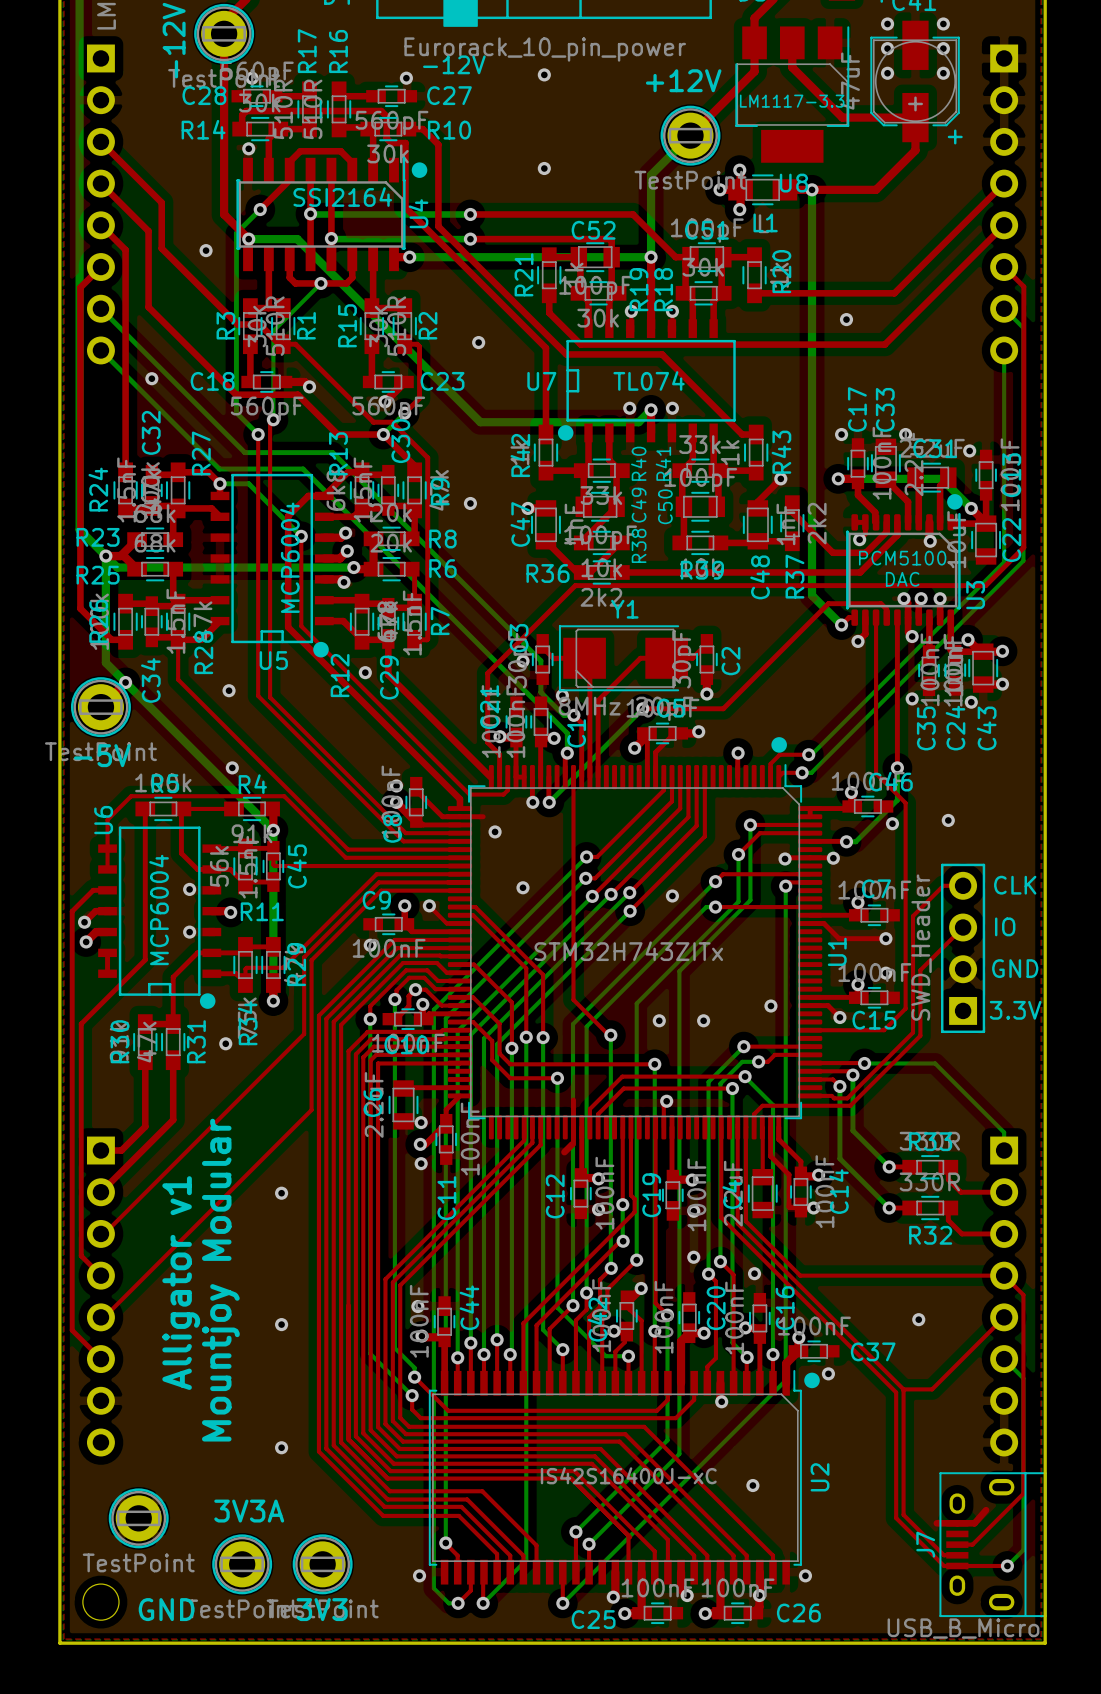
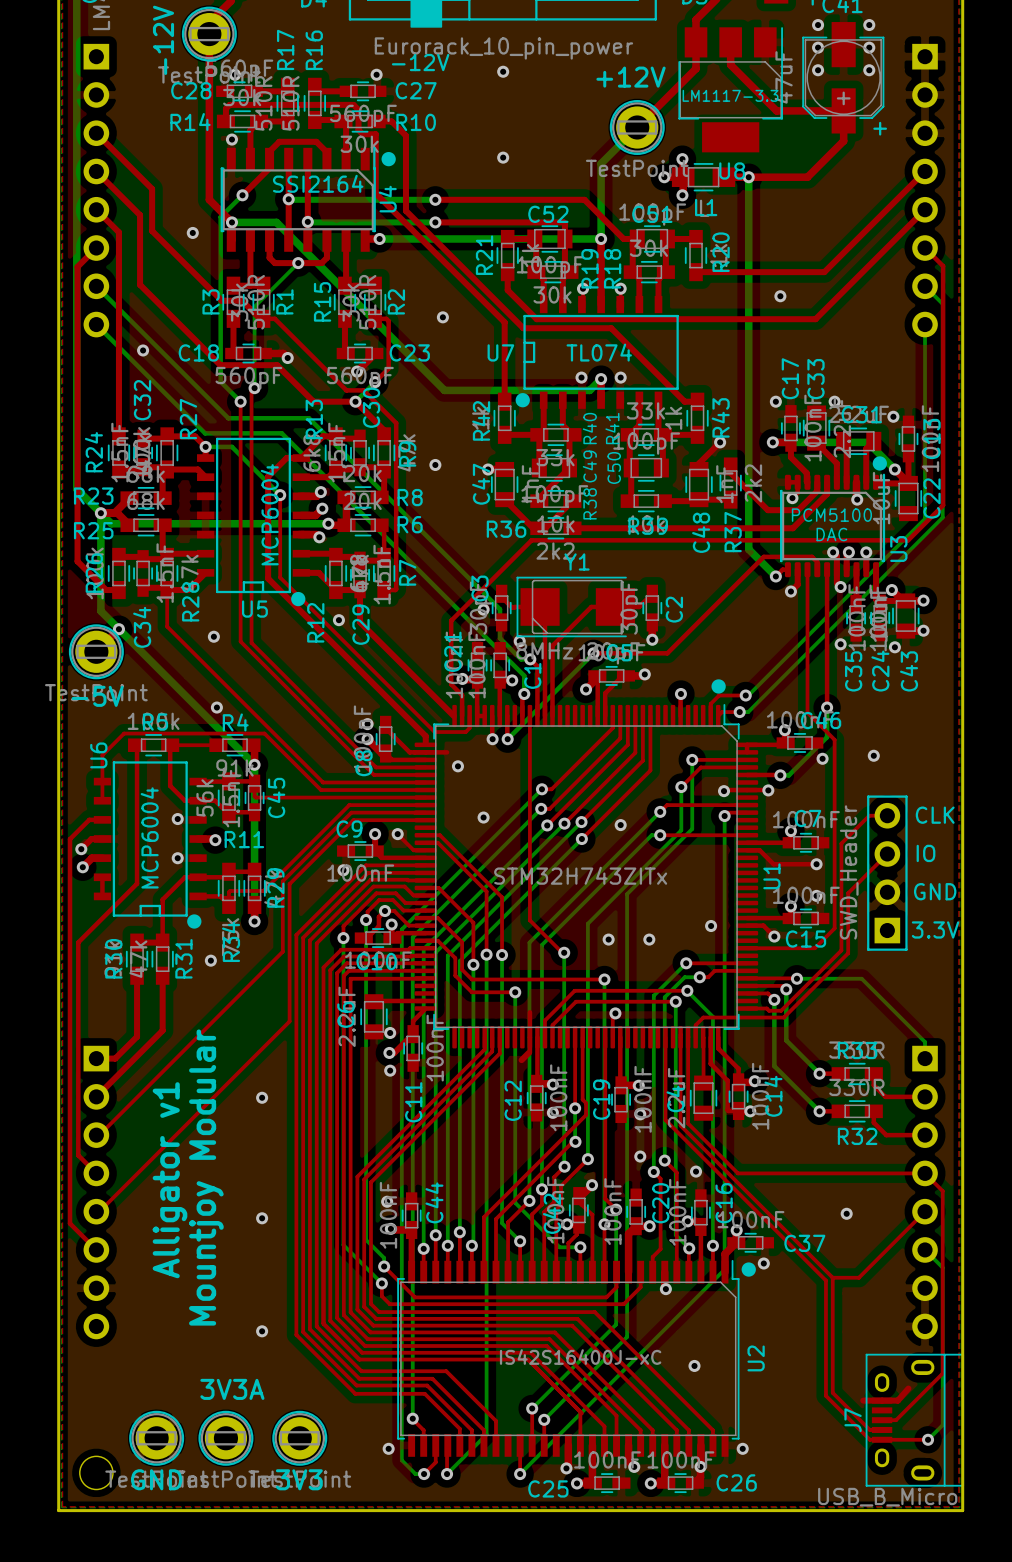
part position: (138, 1518) -> (156, 1438)

